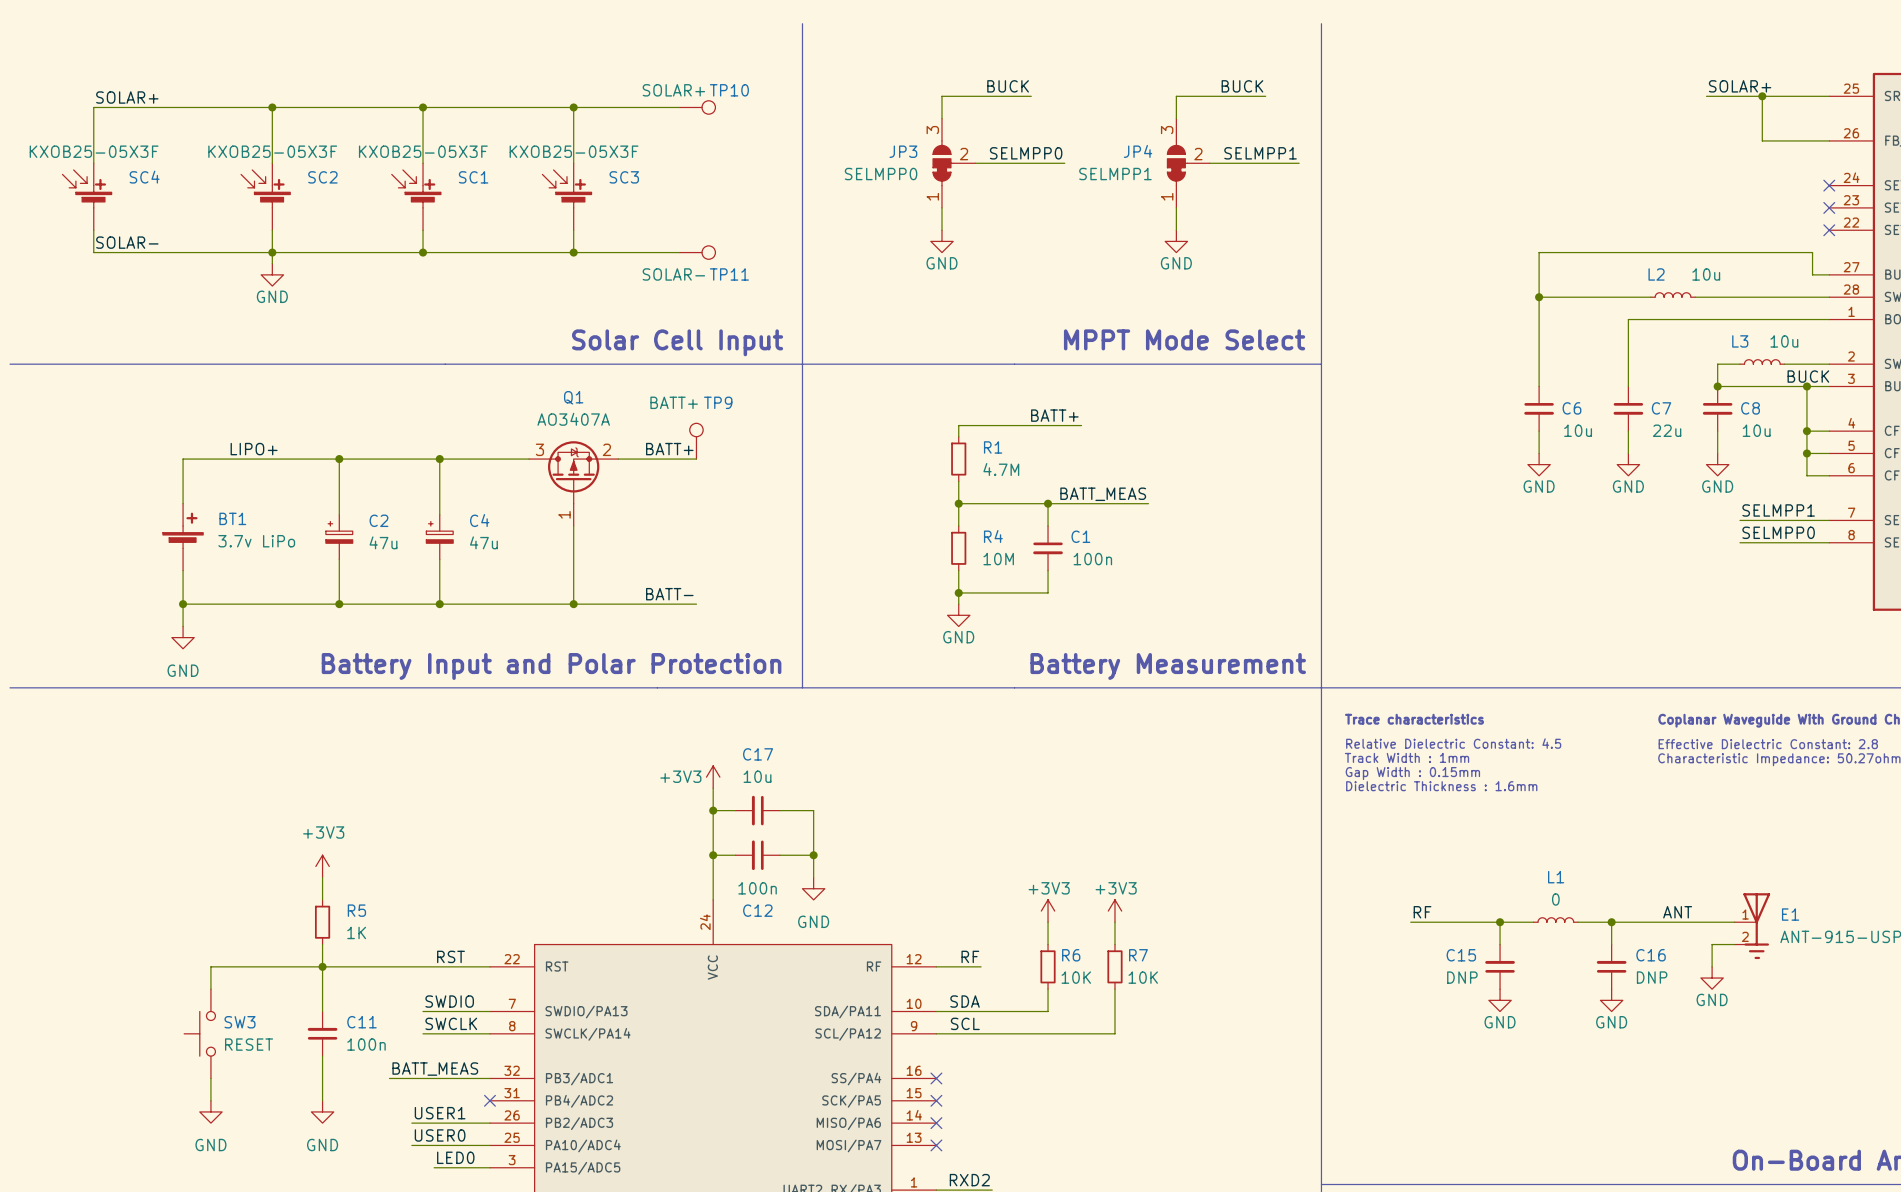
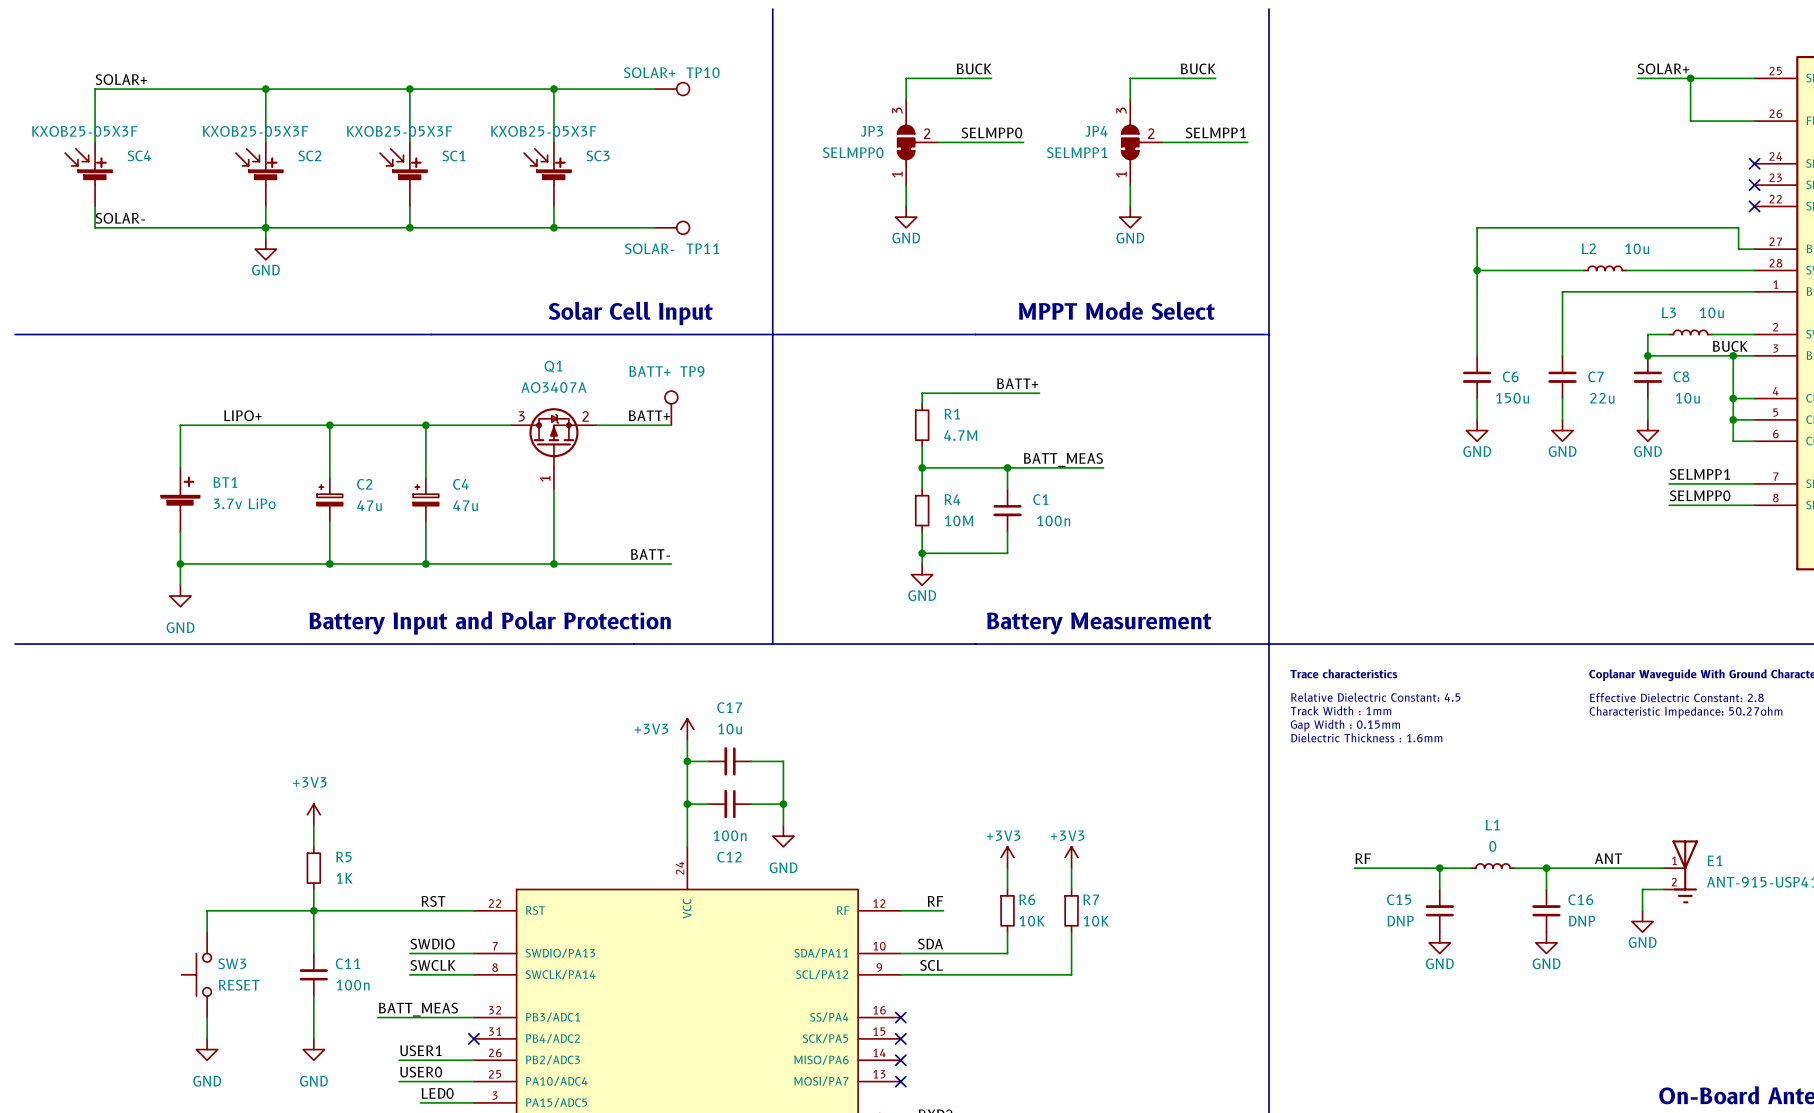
C6 value: 10u (1578, 430) -> 150u (1512, 398)

